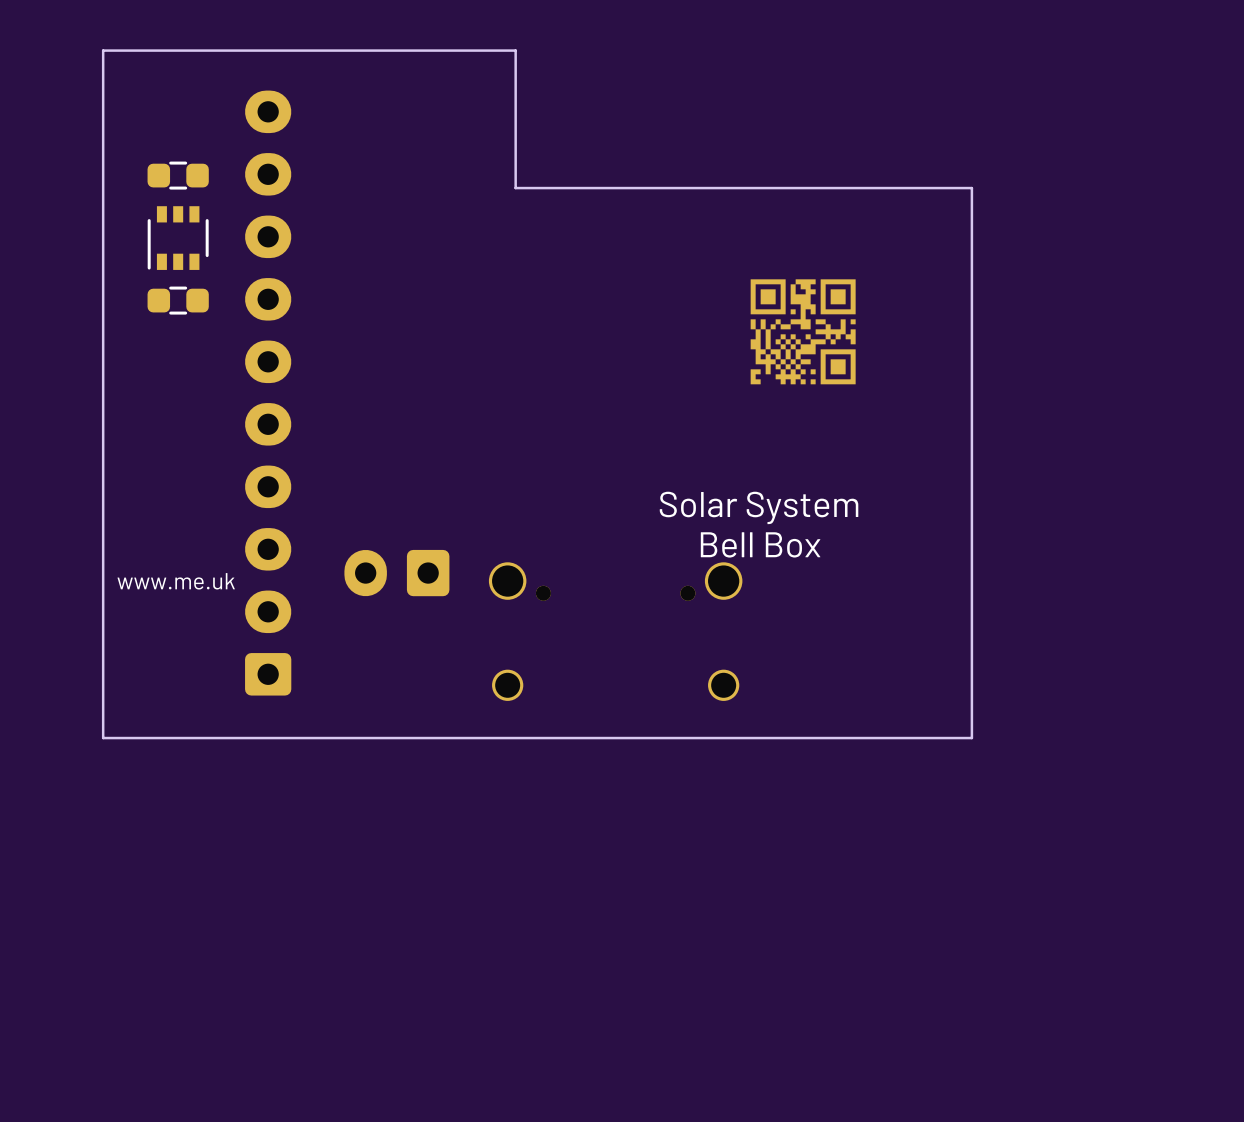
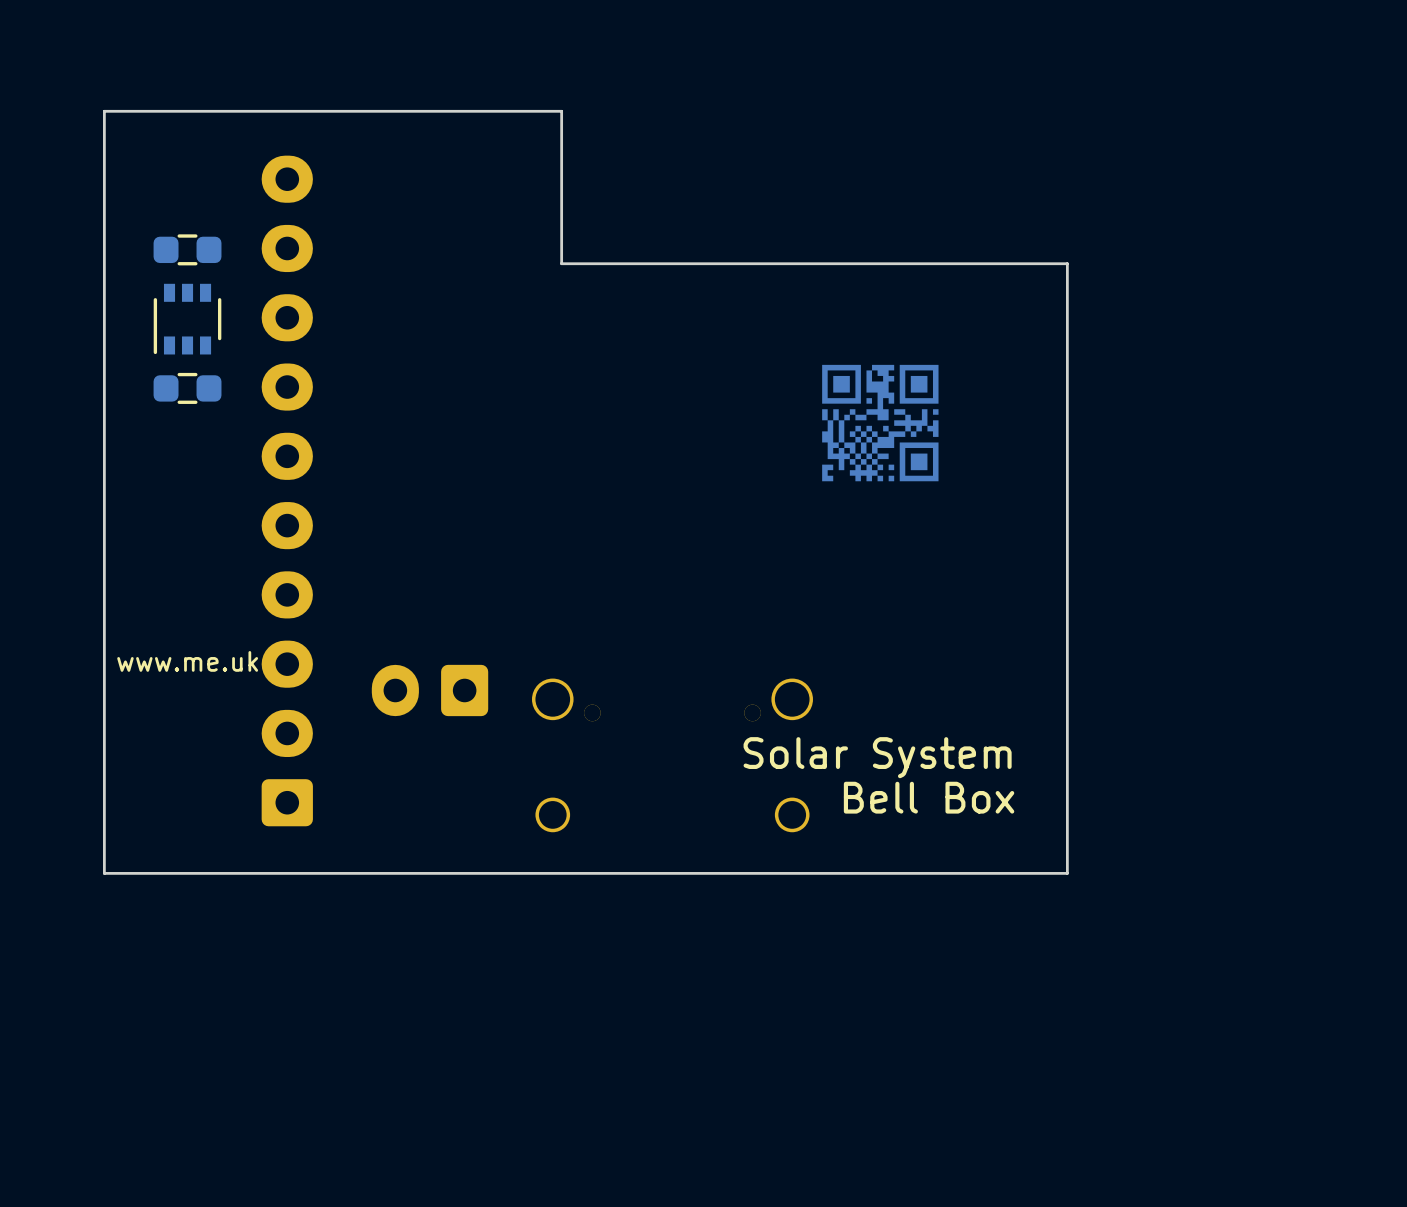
text position: Solar System (759, 507) -> Solar System (877, 757)
text position: Bell Box (760, 544) -> Bell Box (929, 797)
drawing position: (176, 581) -> (187, 661)

